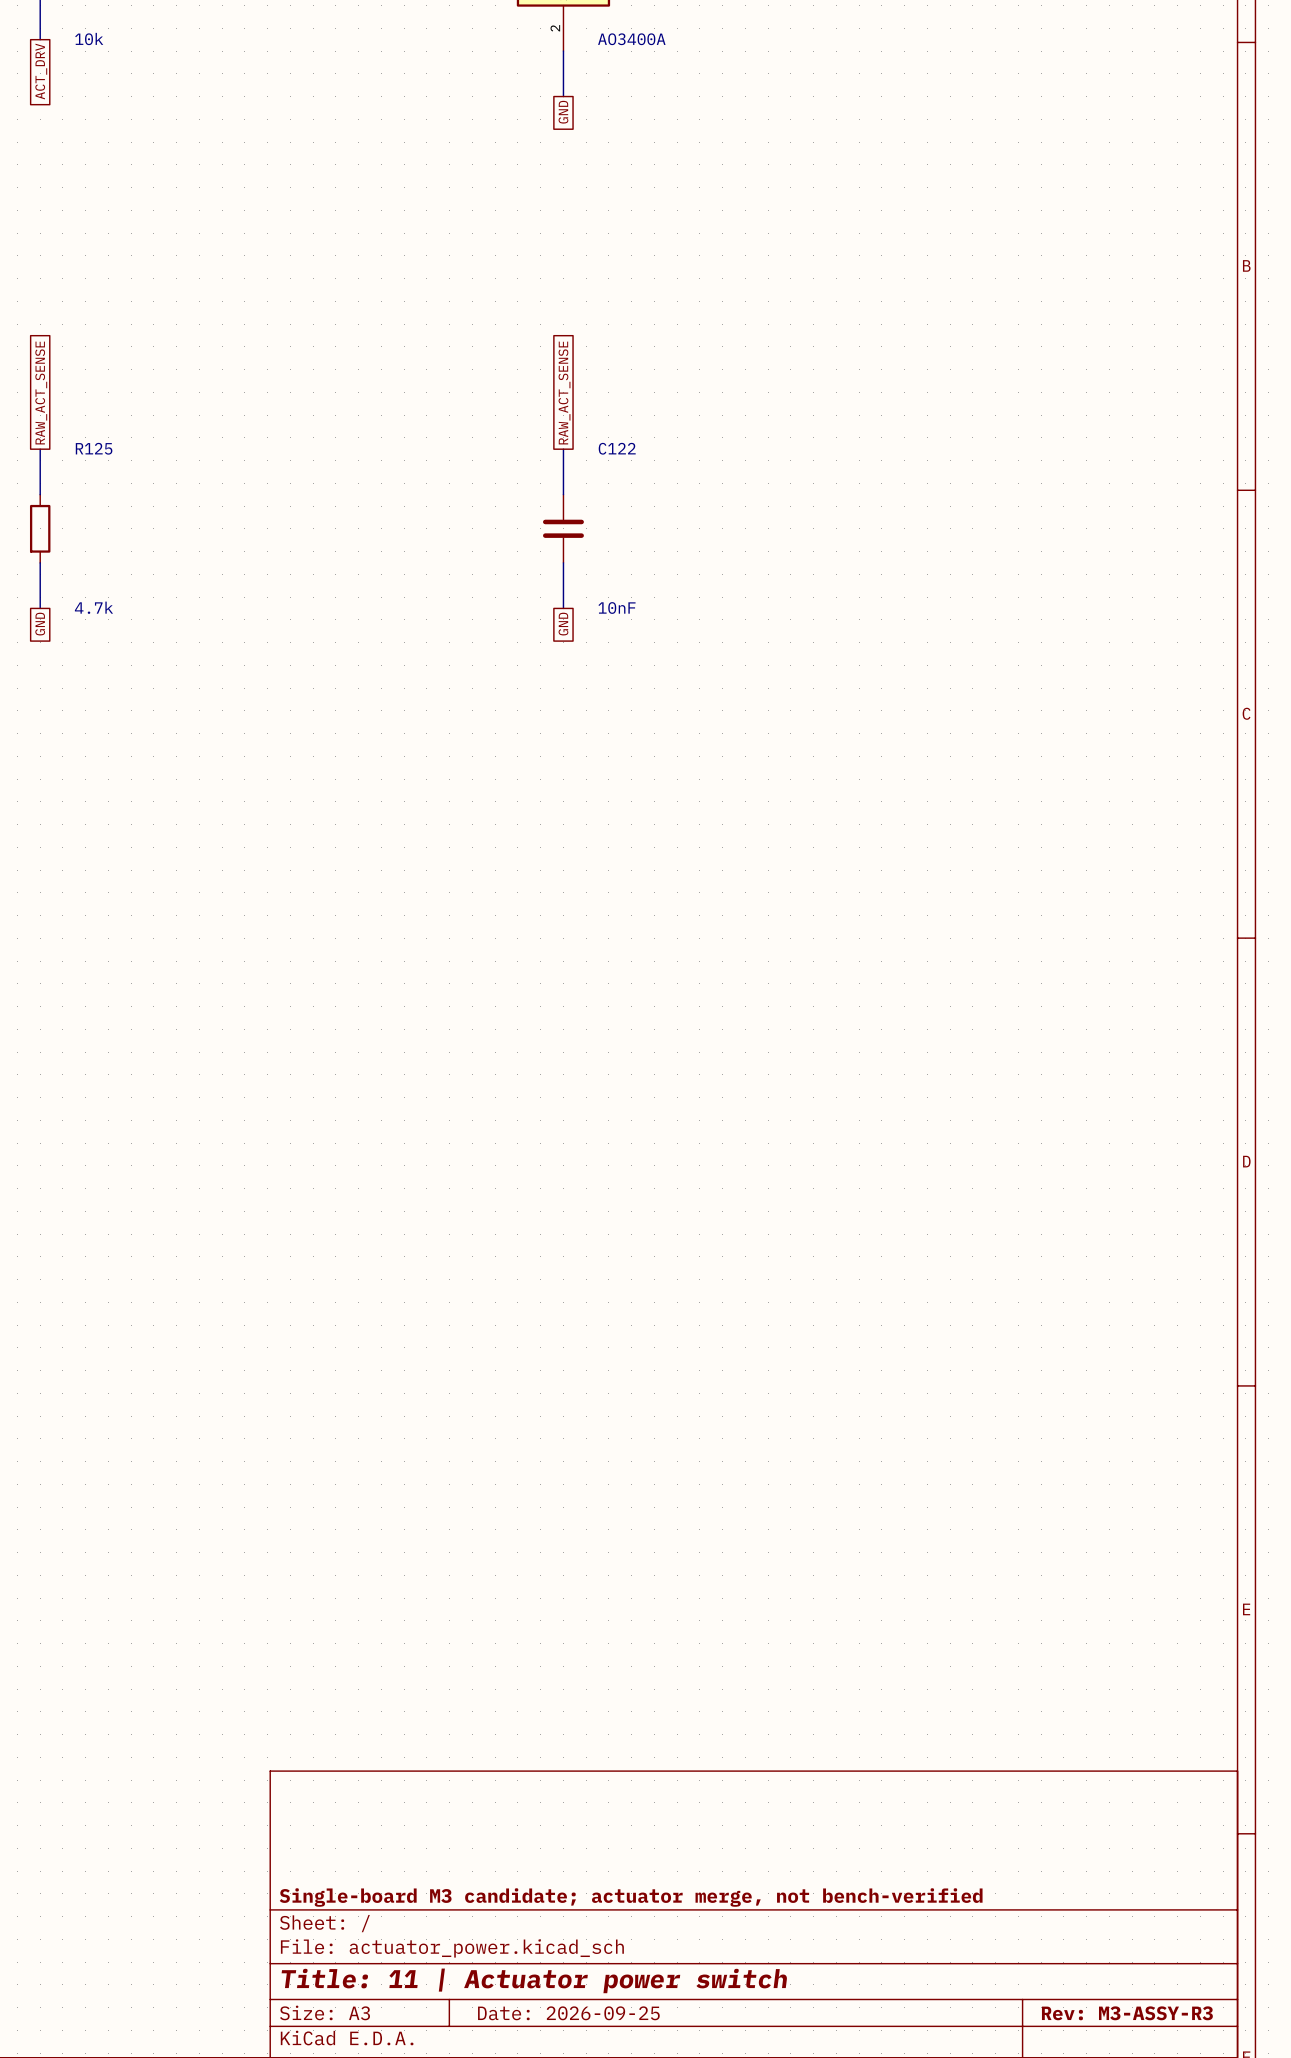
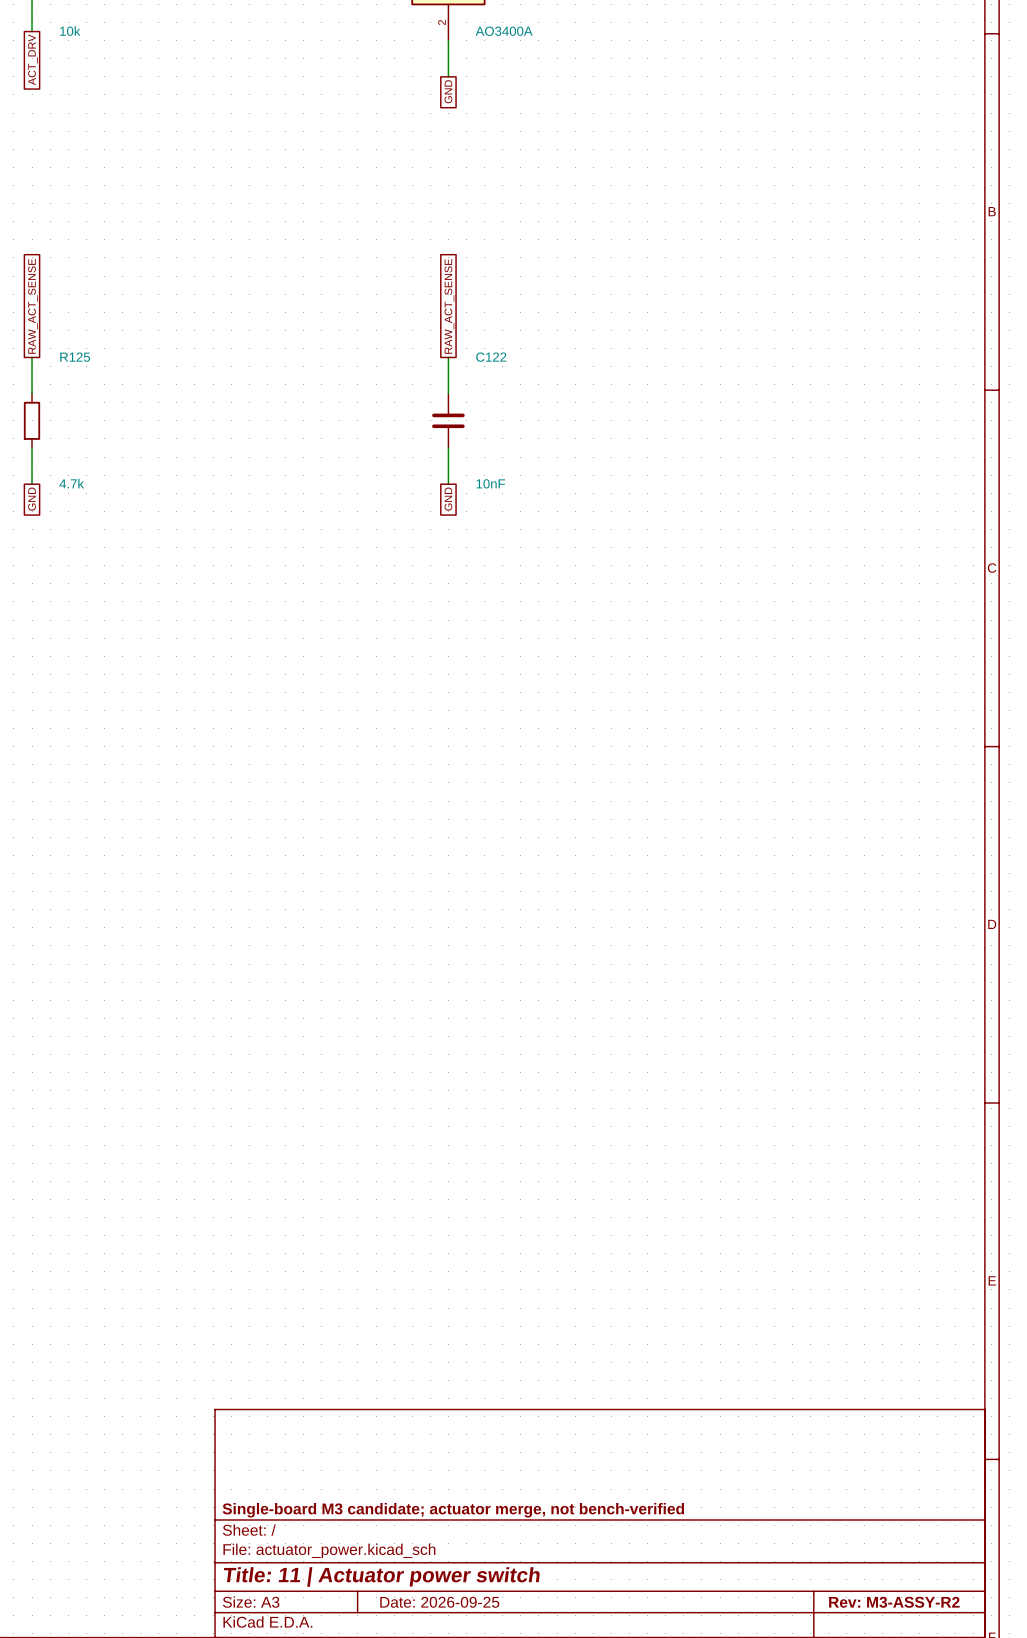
title block: Rev: M3-ASSY-R3 (1127, 2013) -> Rev: M3-ASSY-R2 (894, 1602)

